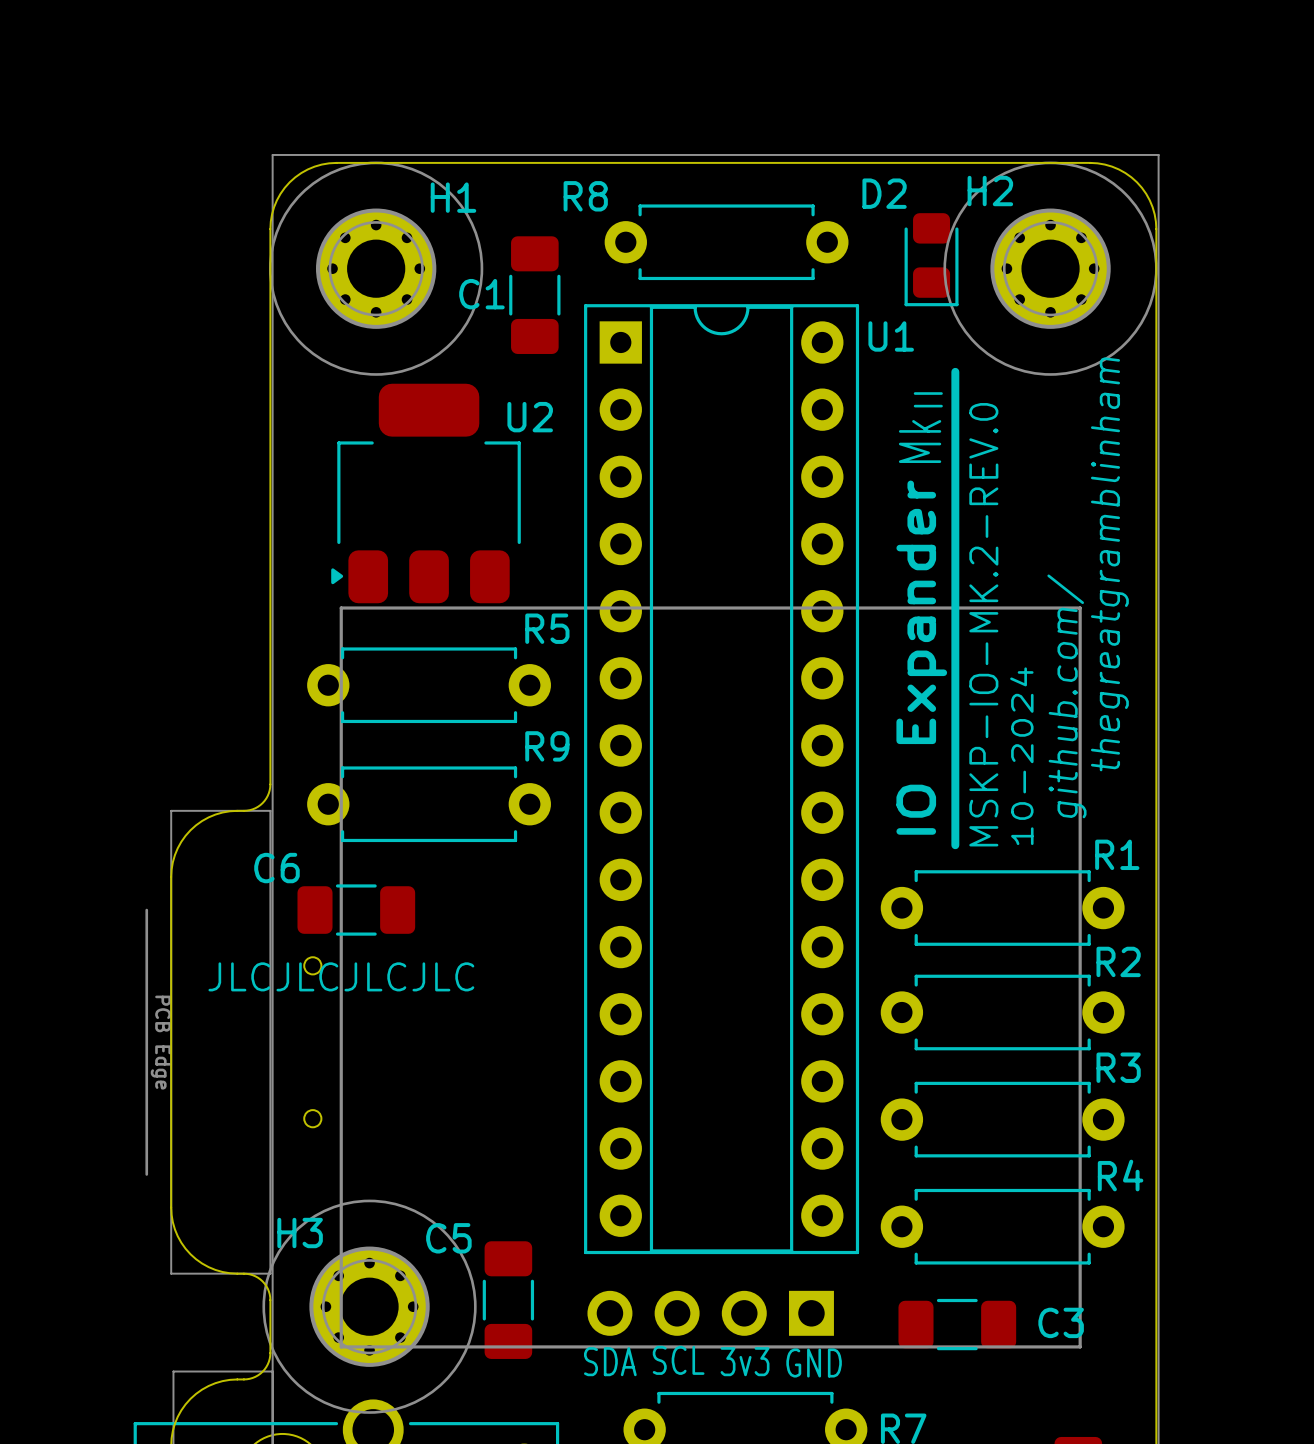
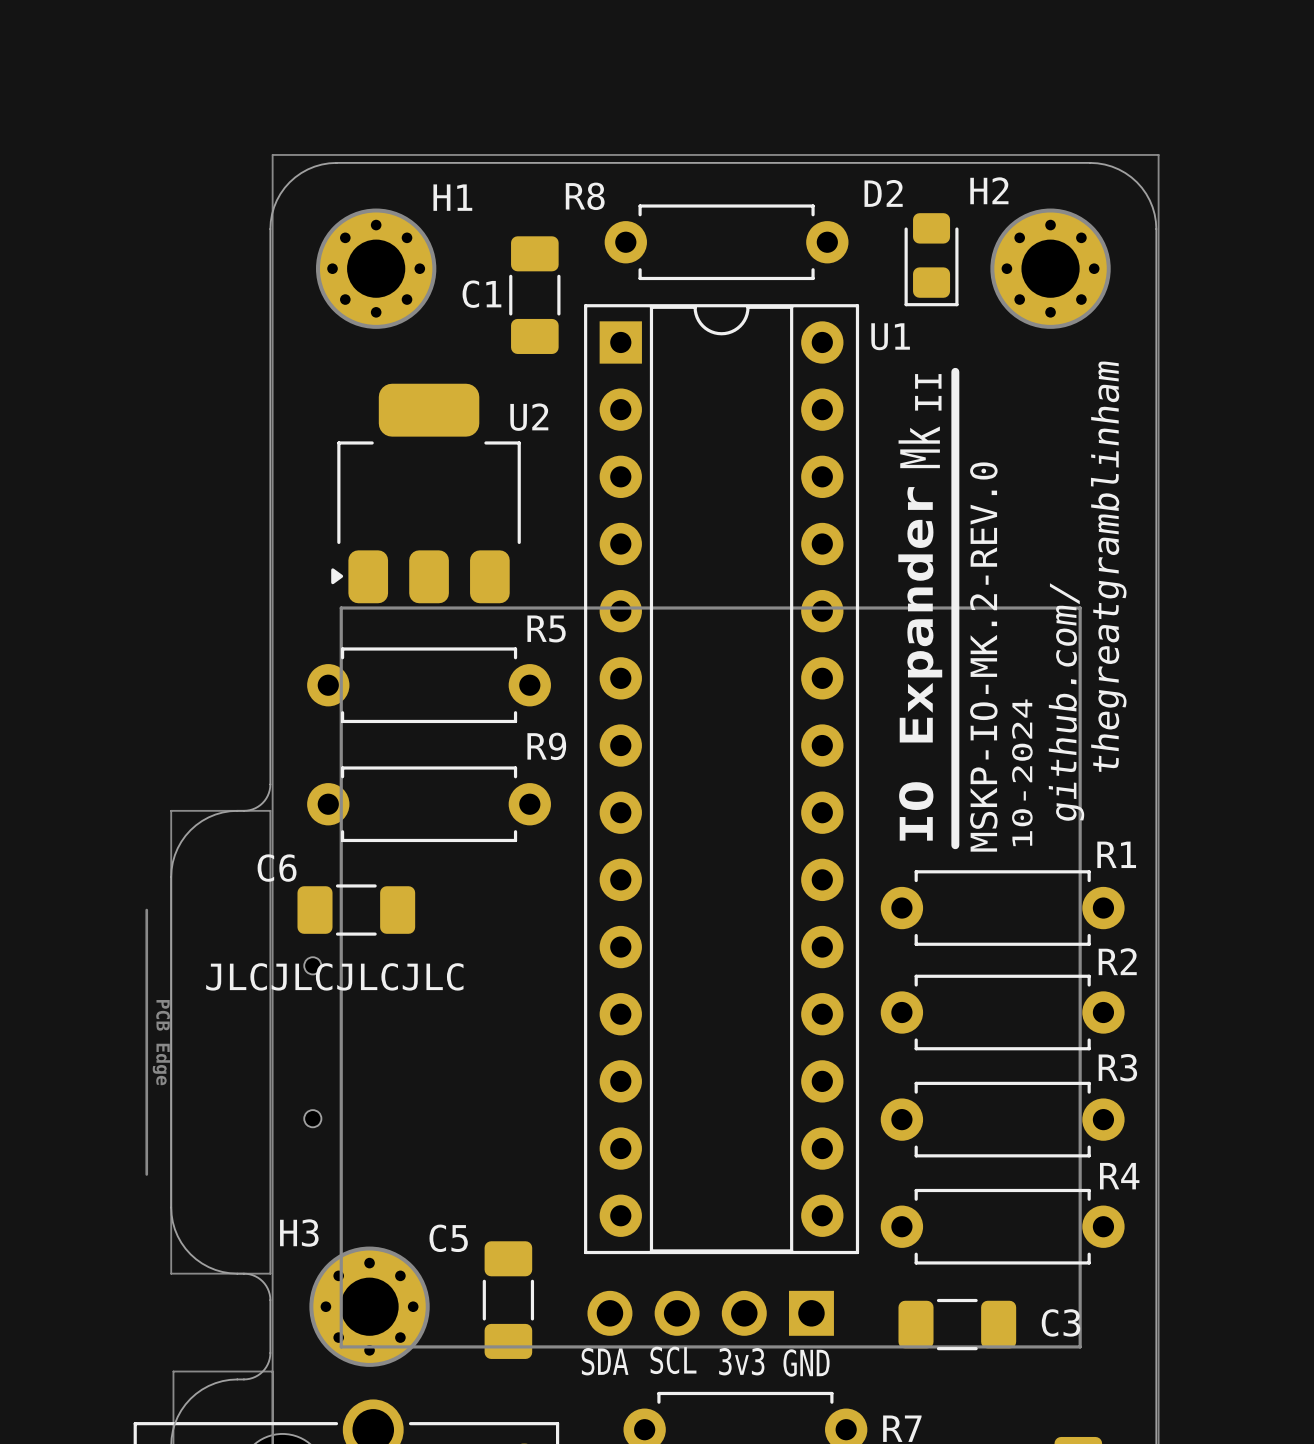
drawing: [269, 161, 484, 376] -> none
drawing: [943, 161, 1158, 376] -> none
drawing: [262, 1199, 477, 1414] -> none

